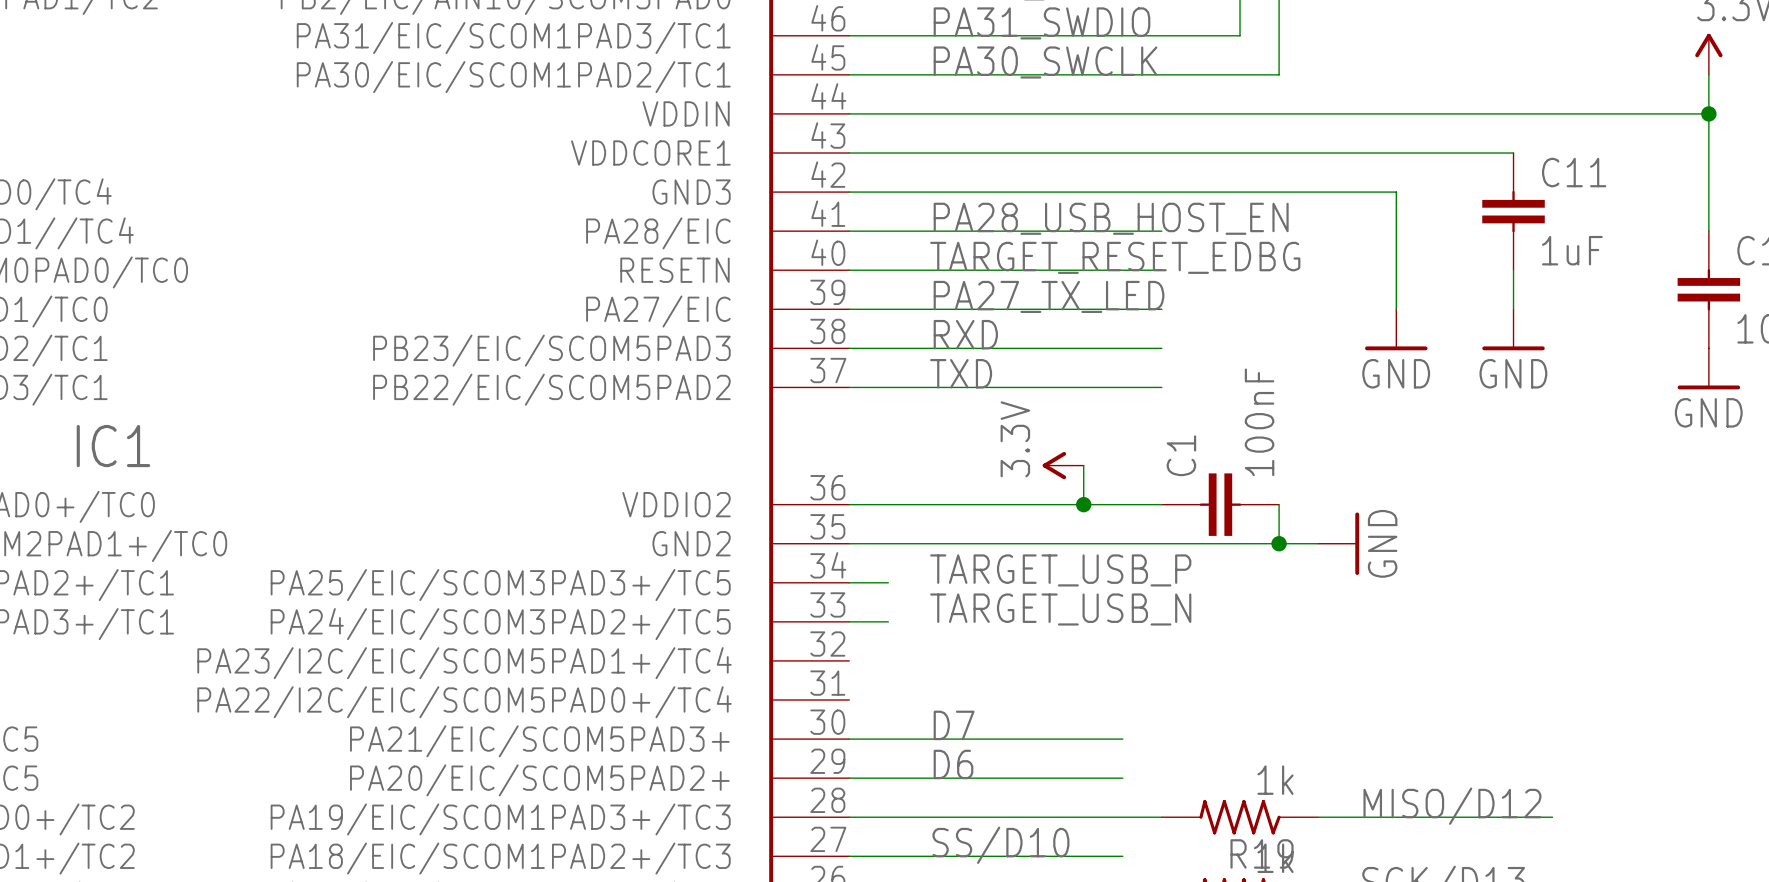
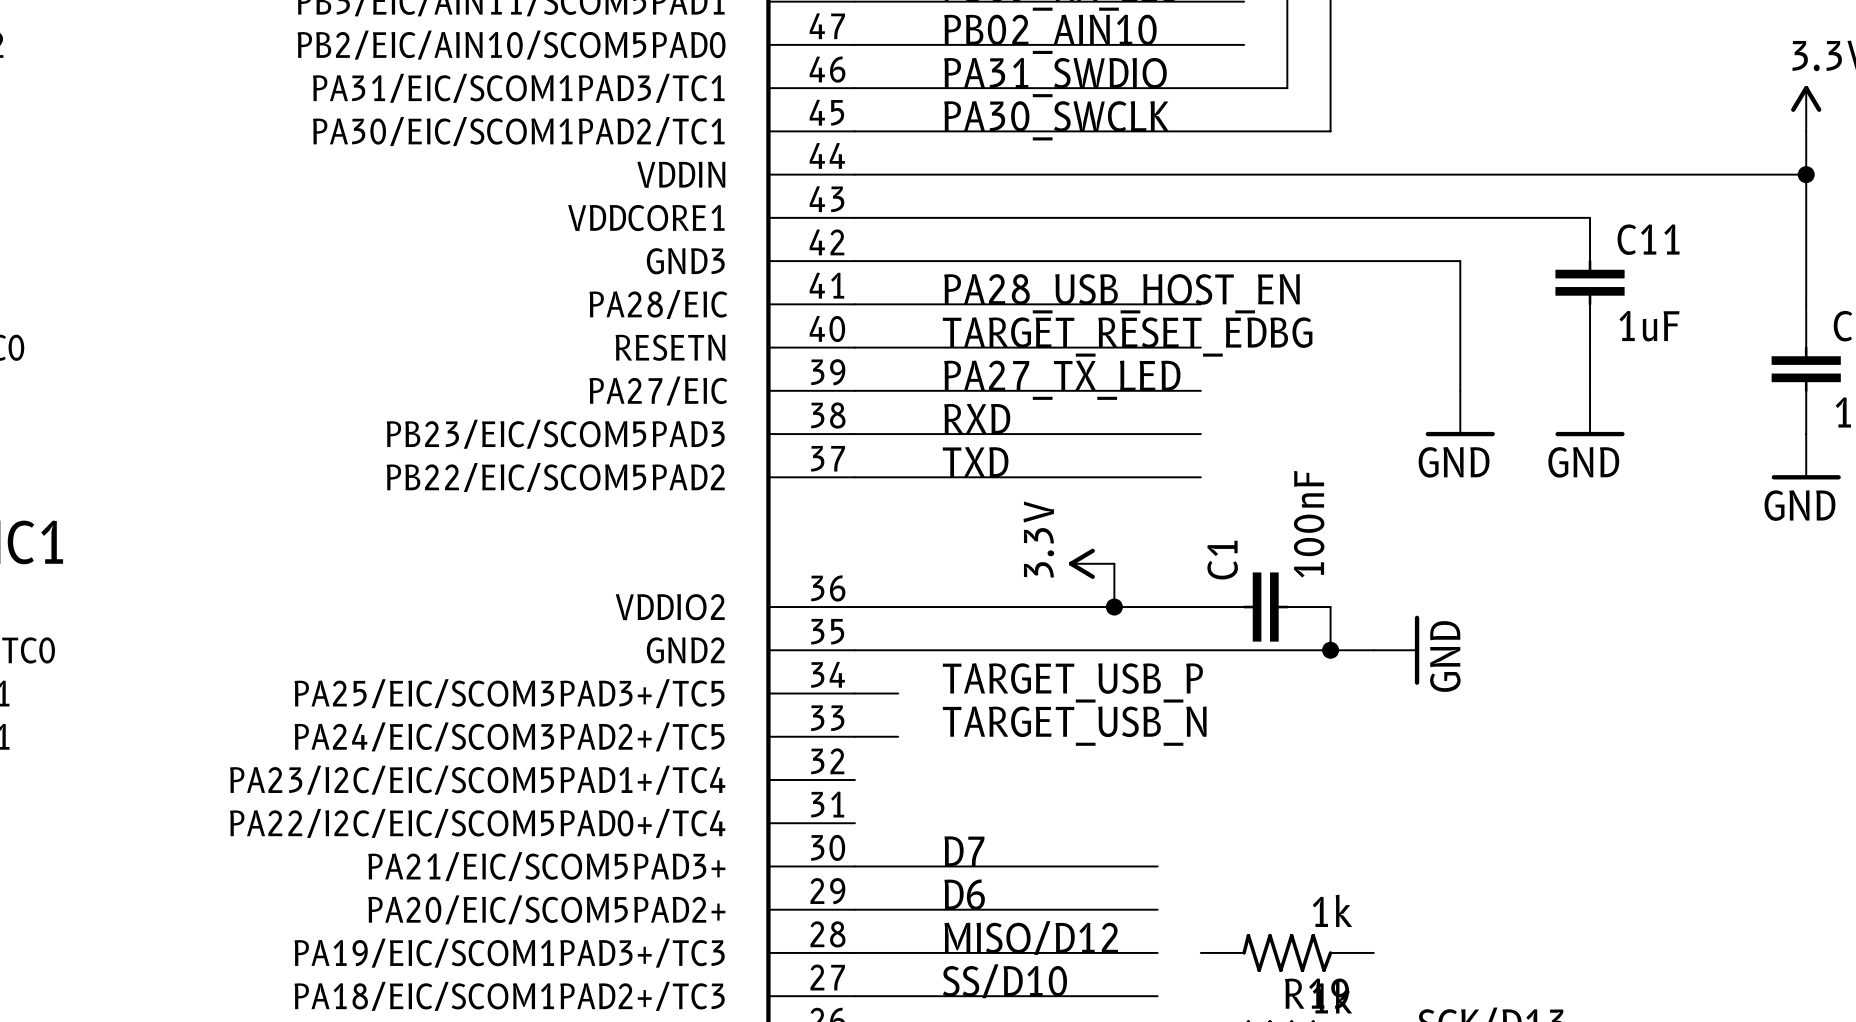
label: none -> MISO/D12 (1031, 938)
label: MISO/D12 (1452, 806) -> none
wire: (1122, 817) (1161, 817) -> none
wire: (1318, 817) (1552, 817) -> none

